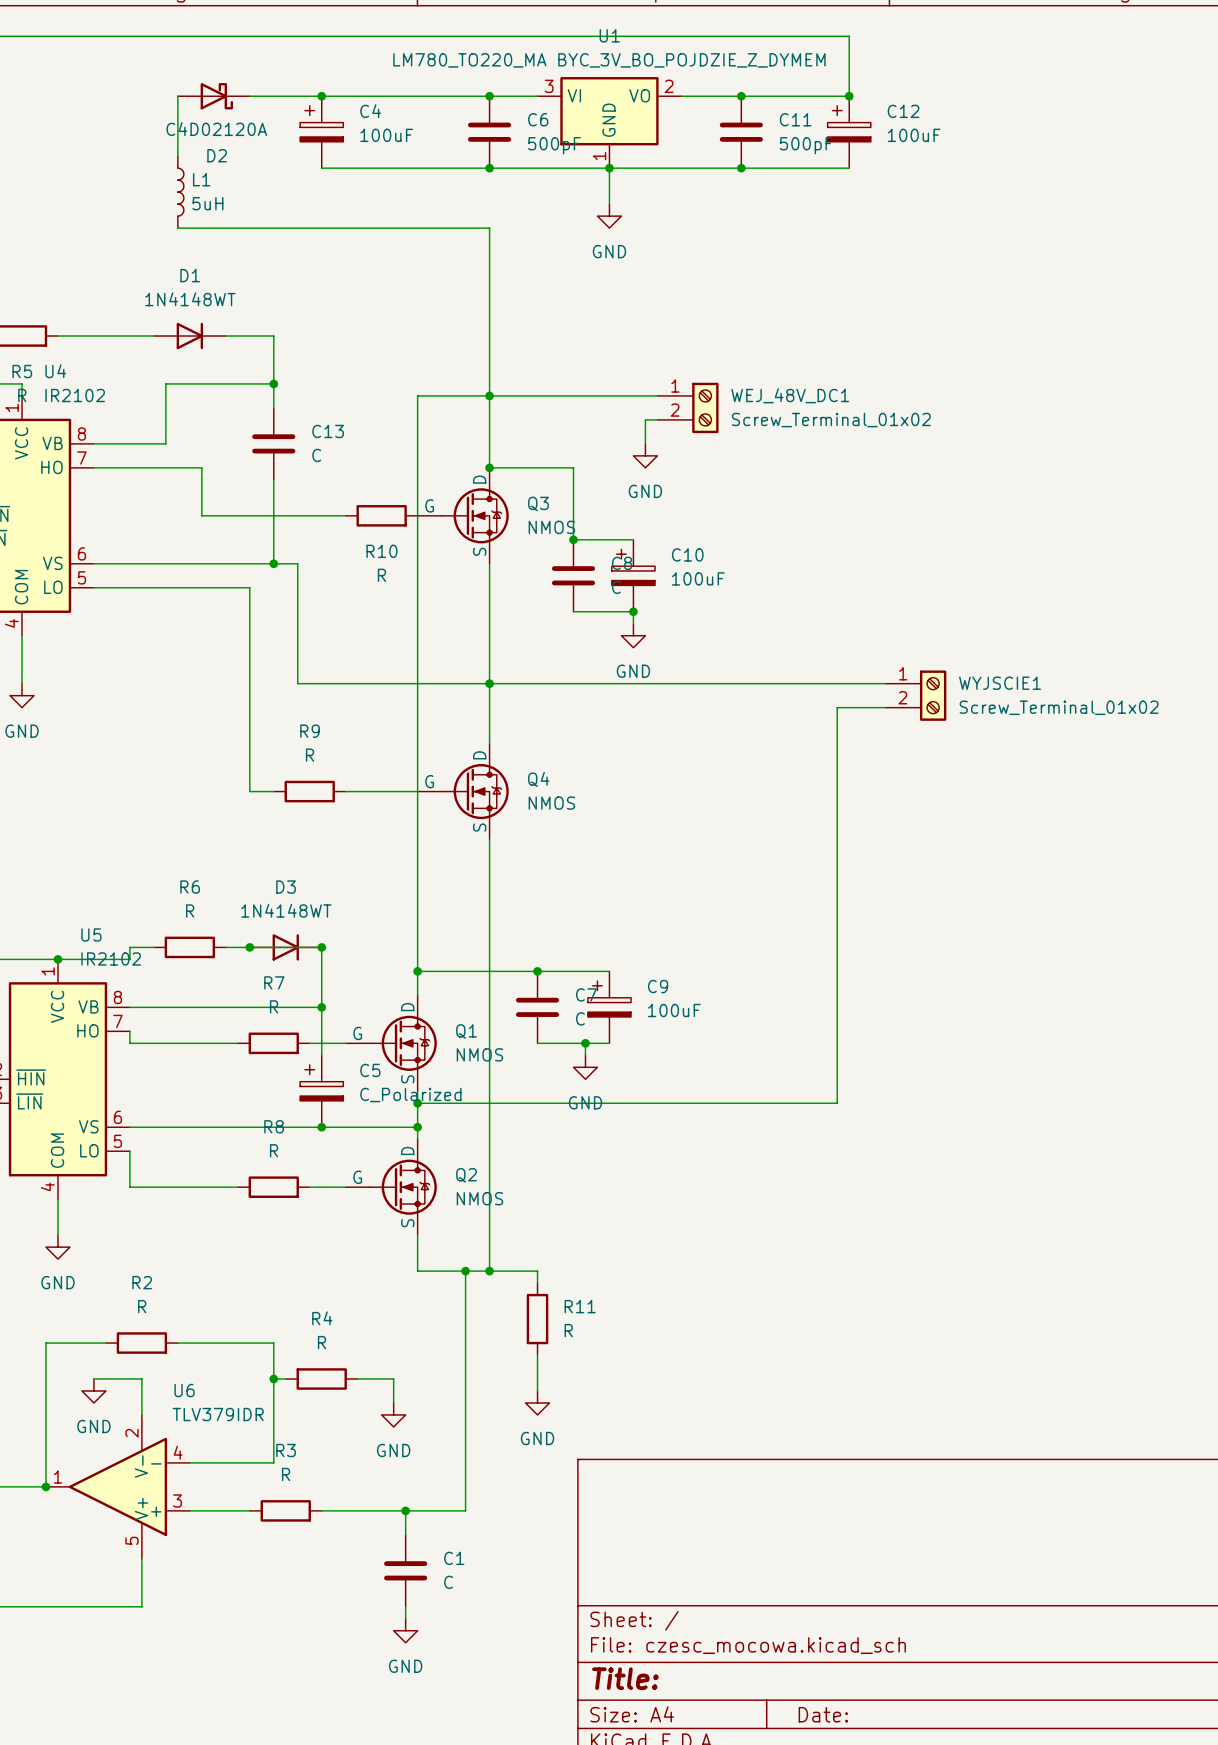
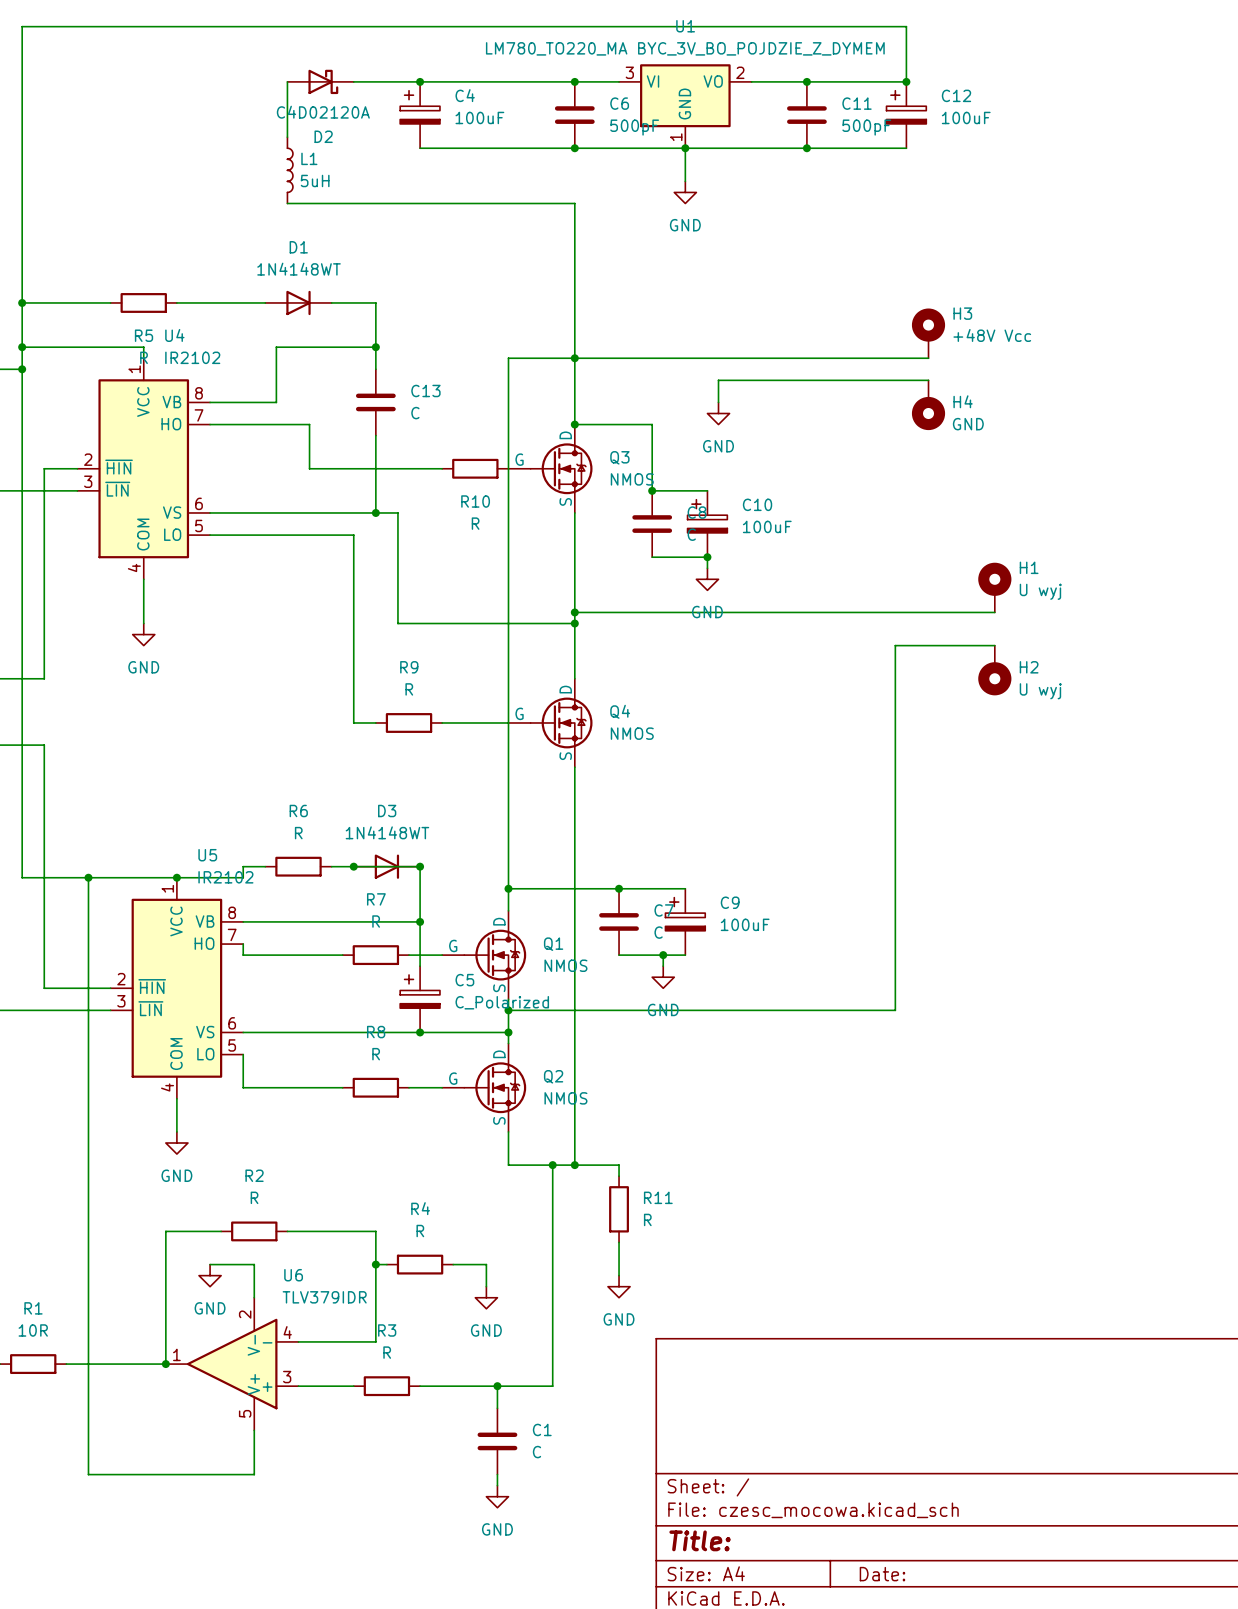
H3: none -> +48V Vcc (928, 333)
wire: none -> (729, 358) (928, 358)
WEJ_48V_DC1: Screw_Terminal_01x02 (687, 407) -> none
wire: none -> (729, 380) (928, 380)
H4: none -> GND (928, 405)
H1: none -> U wyj (994, 587)
wire: none -> (574, 612) (994, 612)
junction: none -> (574, 612)
wire: (489, 683) (885, 683) -> none
WYJSCIE1: Screw_Terminal_01x02 (915, 695) -> none
H2: none -> U wyj (994, 670)

